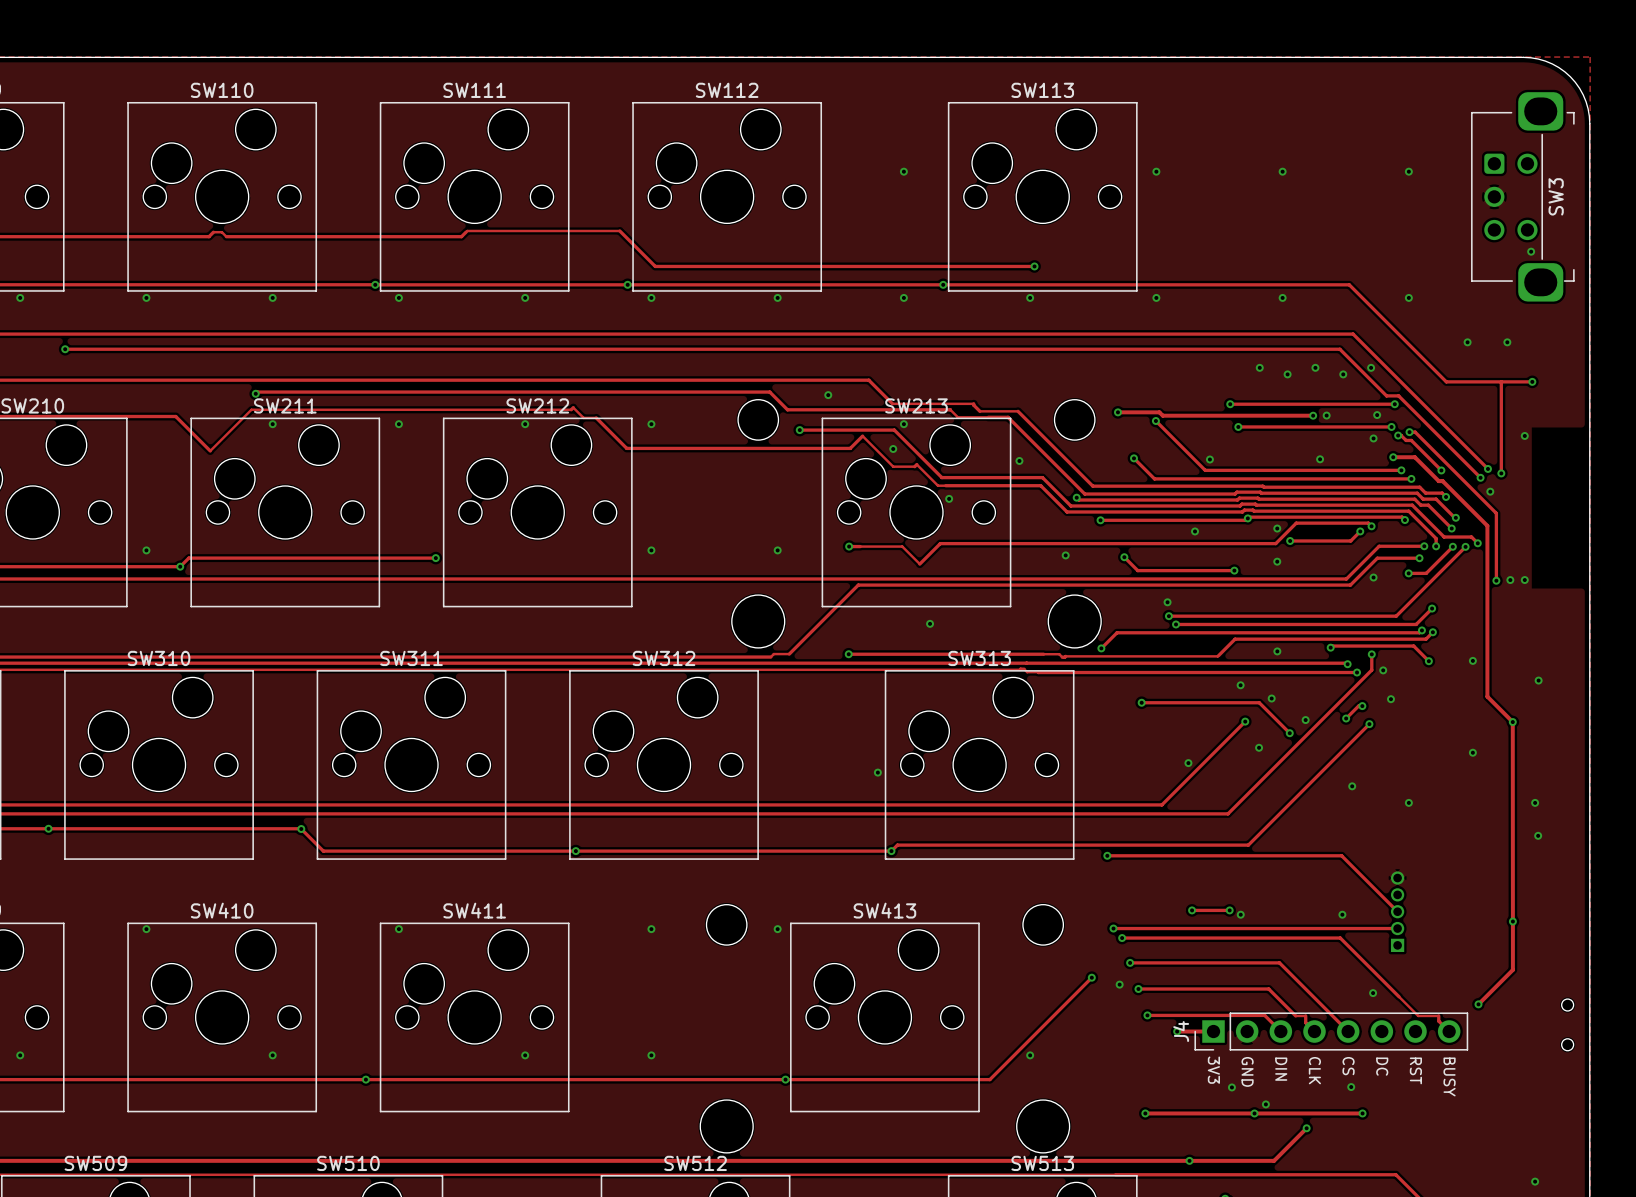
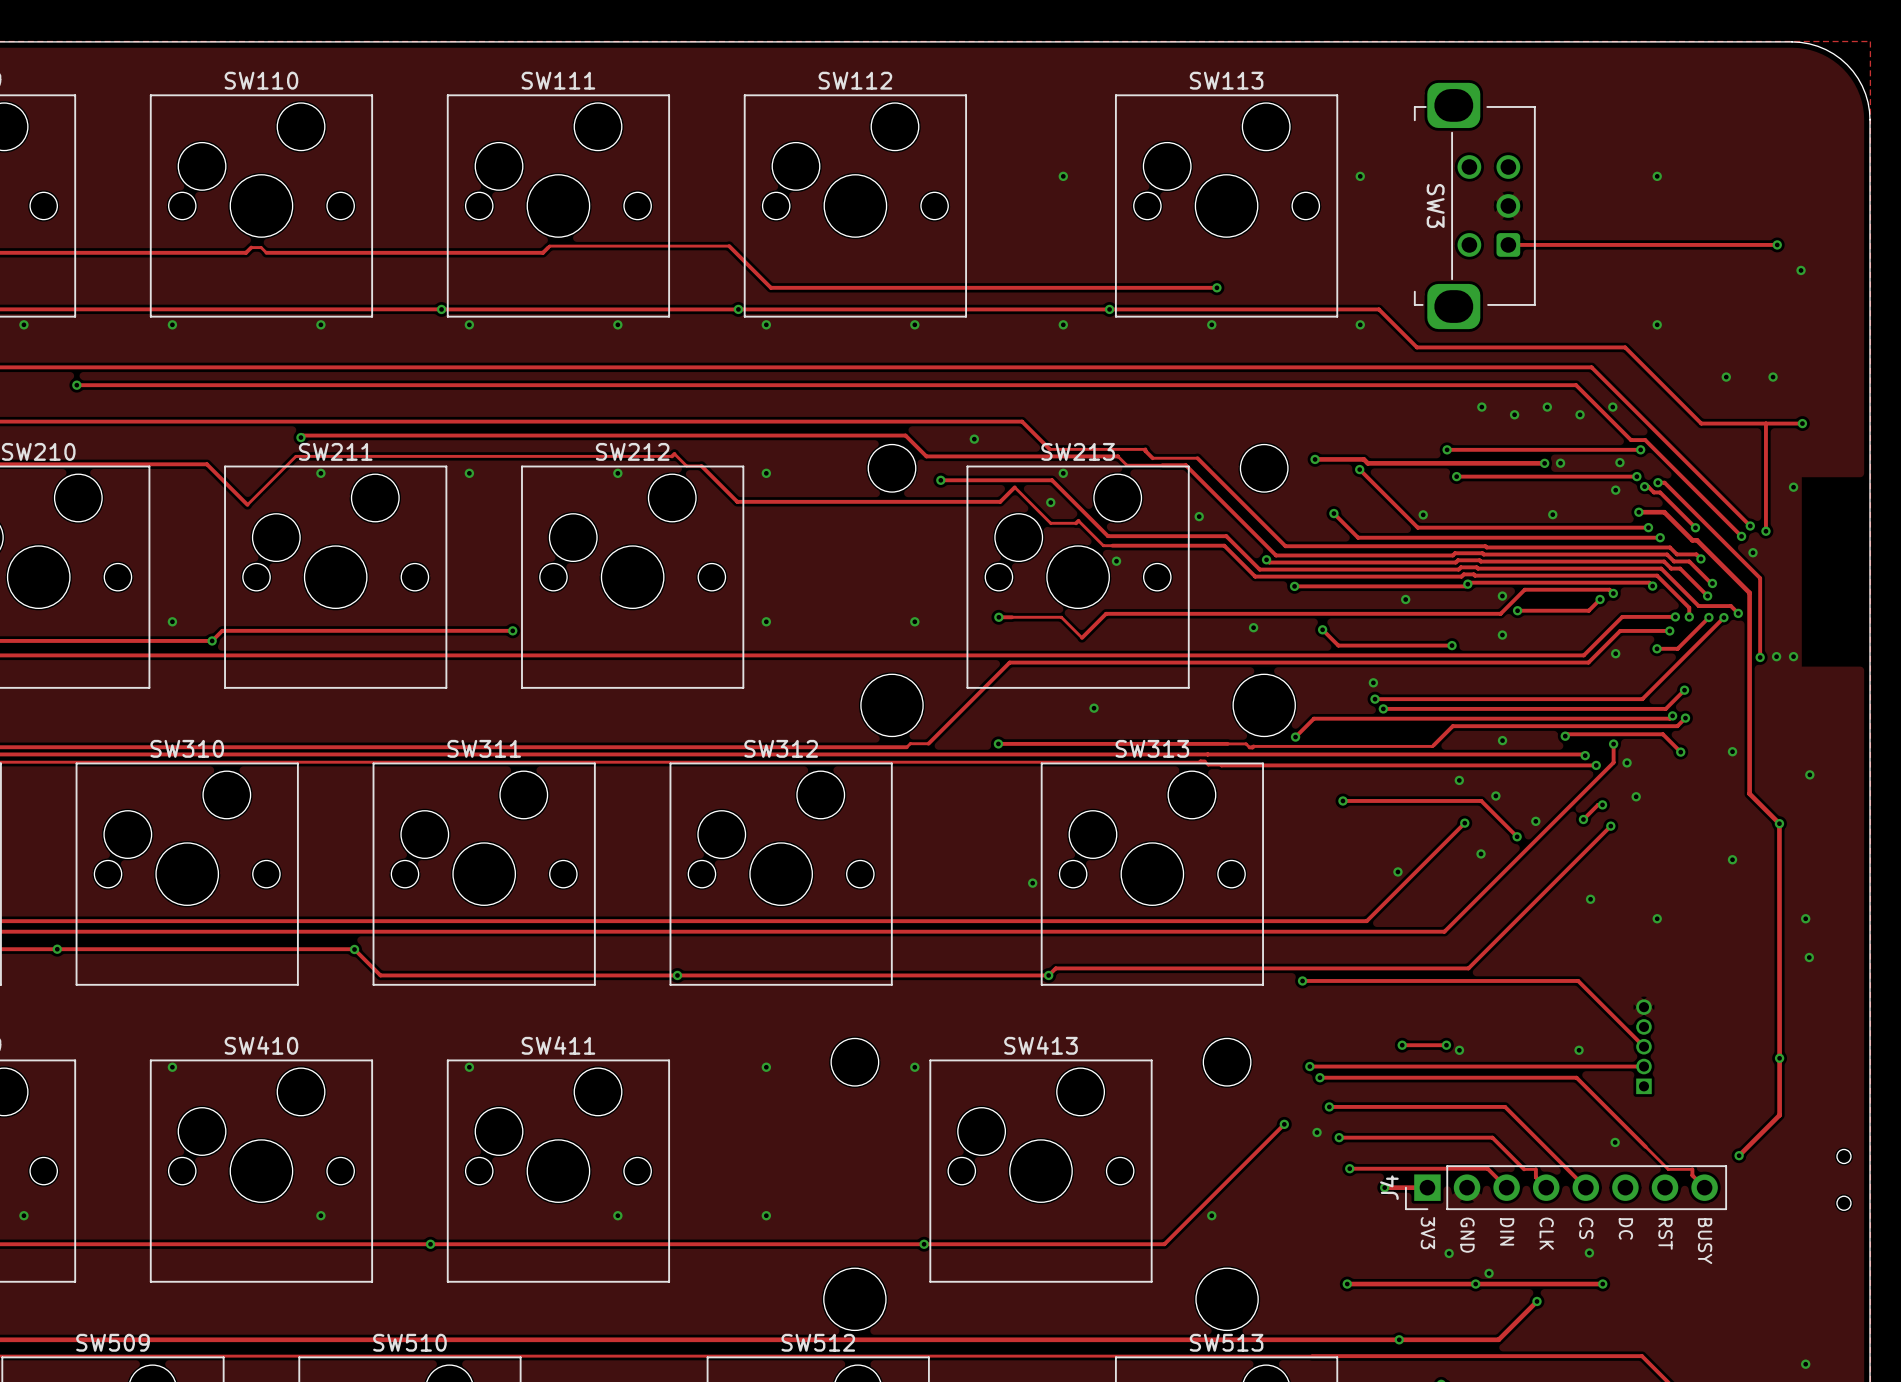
via: (1282, 171) -> none
SW3 rotation: 0° (1522, 196) -> 180° (1474, 205)
SW3 position: (1522, 196) -> (1474, 205)
track: none -> (1508, 244) (1777, 244)
via: none -> (1777, 244)
track: (1172, 284) (1349, 284) (1381, 317) -> (1378, 309) (1416, 347) (1625, 347)
via: (1282, 297) -> none

